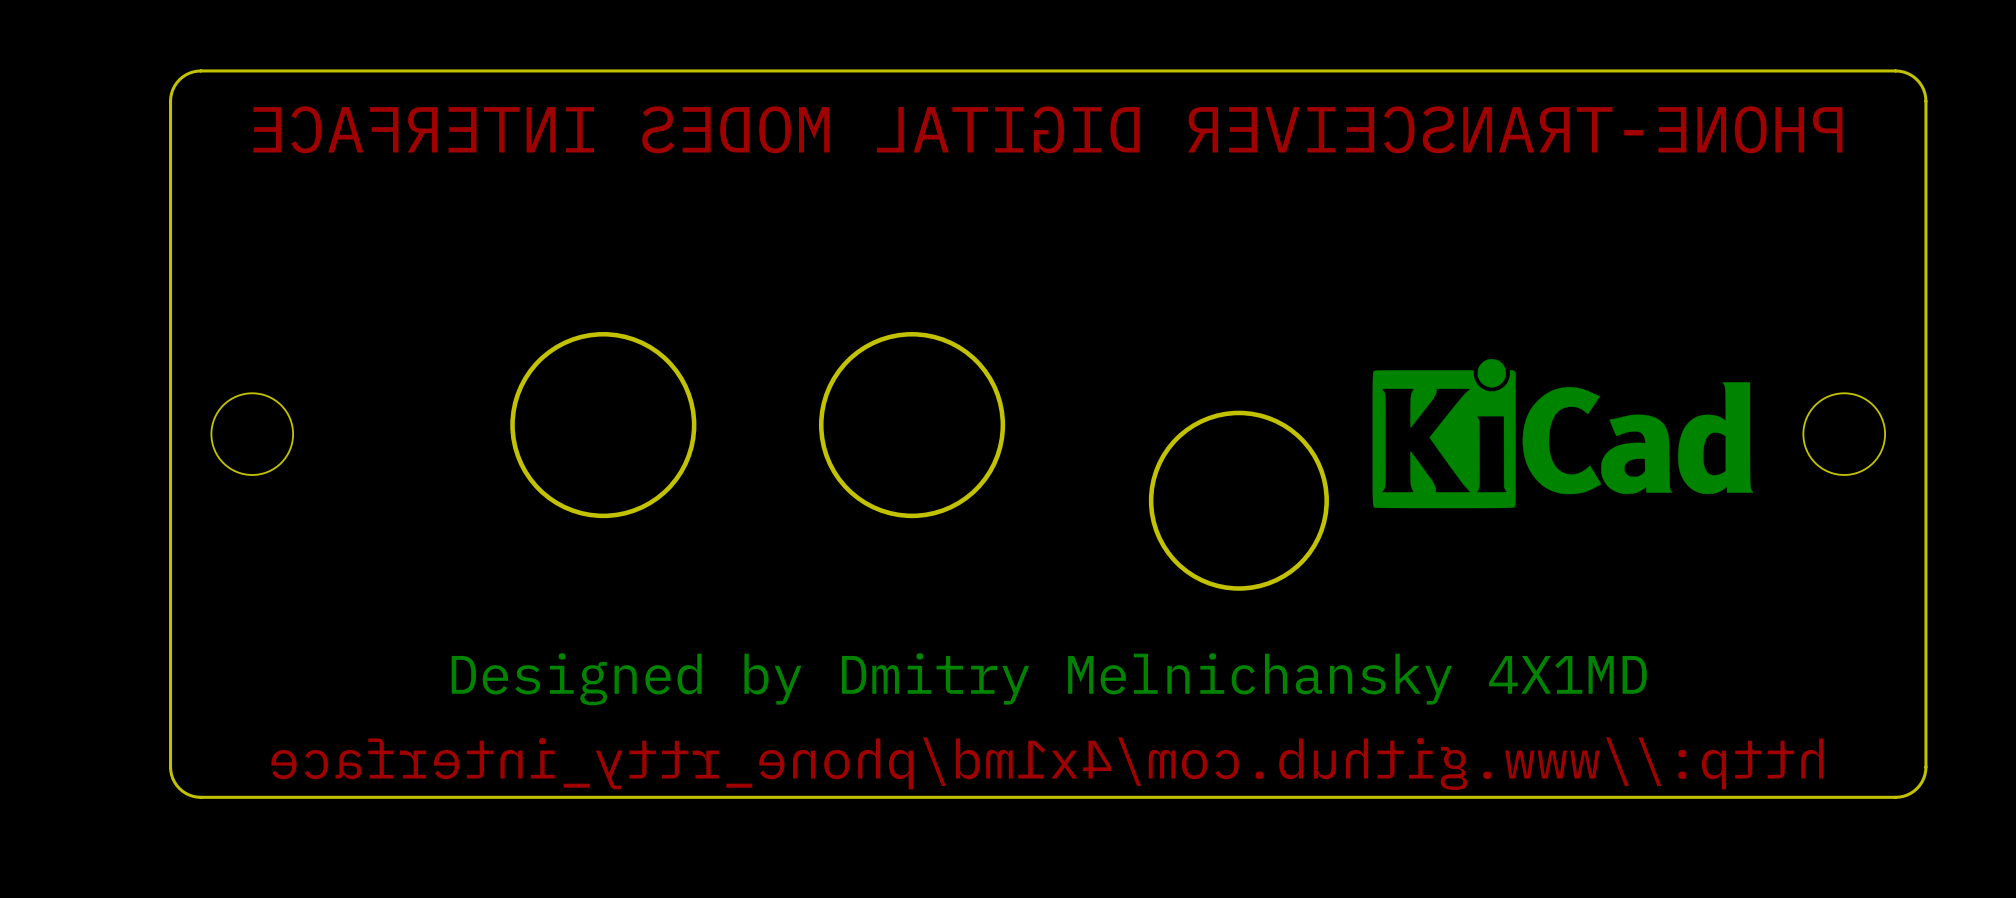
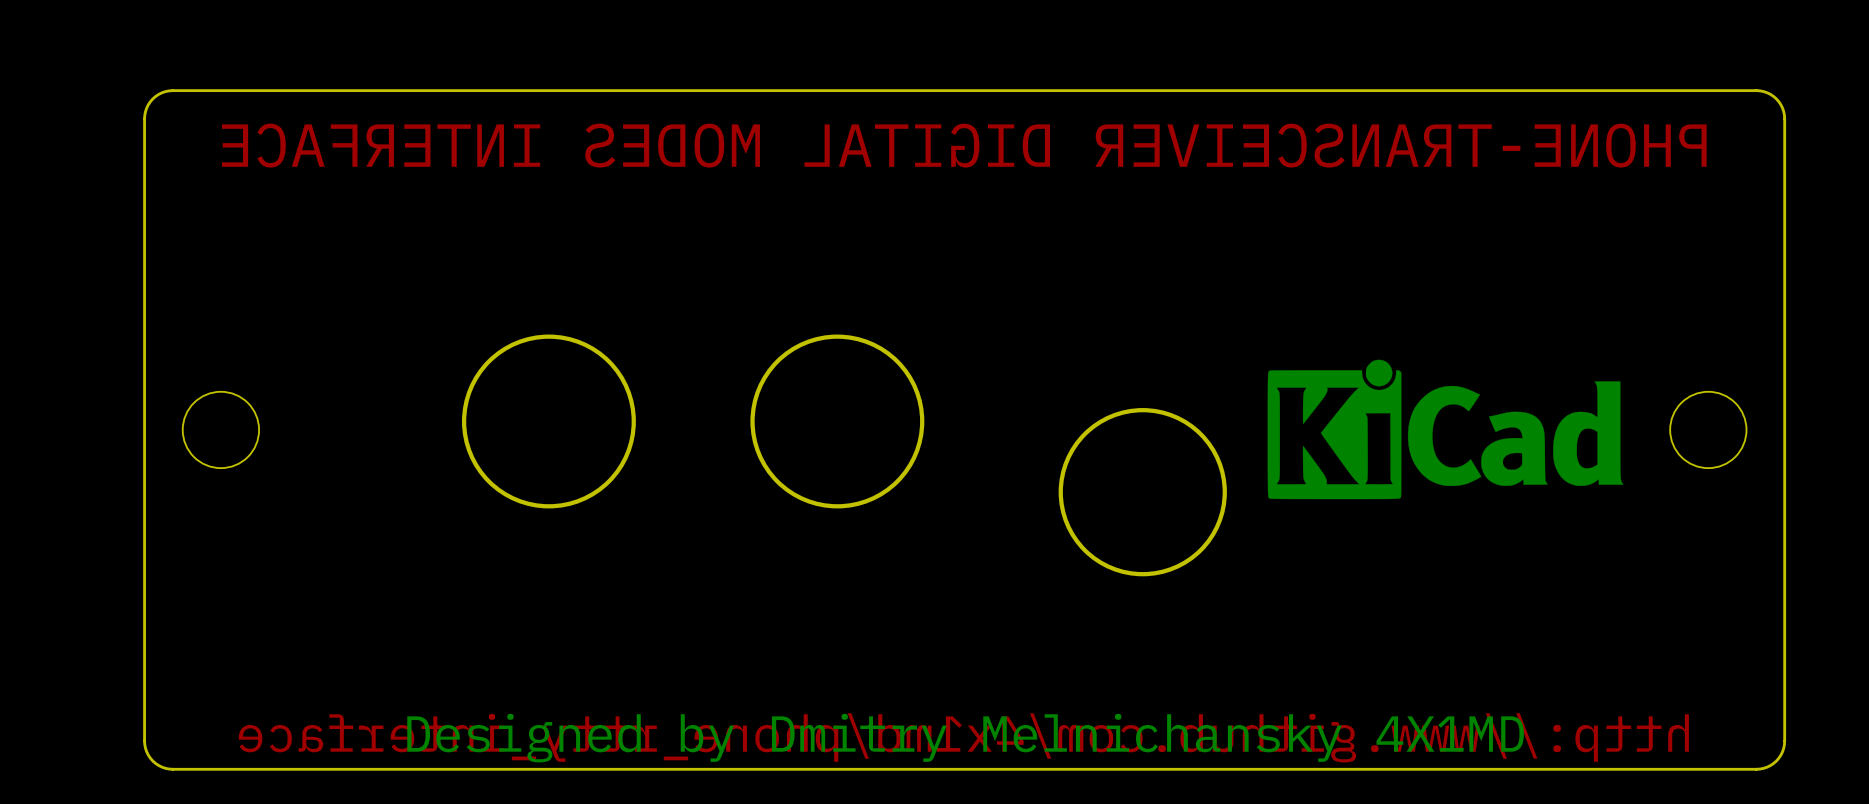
text position: Designed by Dmitry Melnichansky 4X1MD (1049, 679) -> Designed by Dmitry Melnichansky 4X1MD (965, 738)

